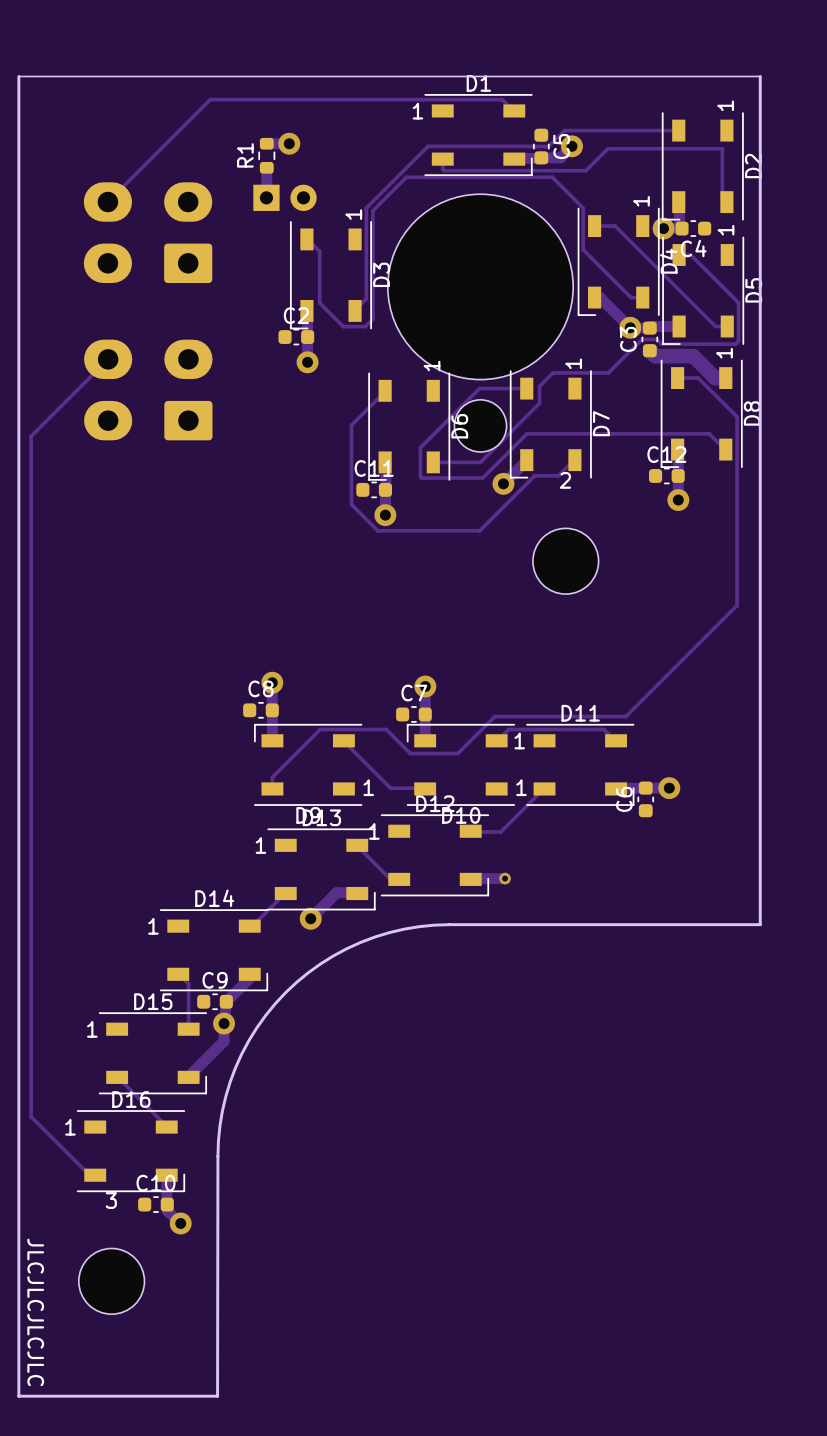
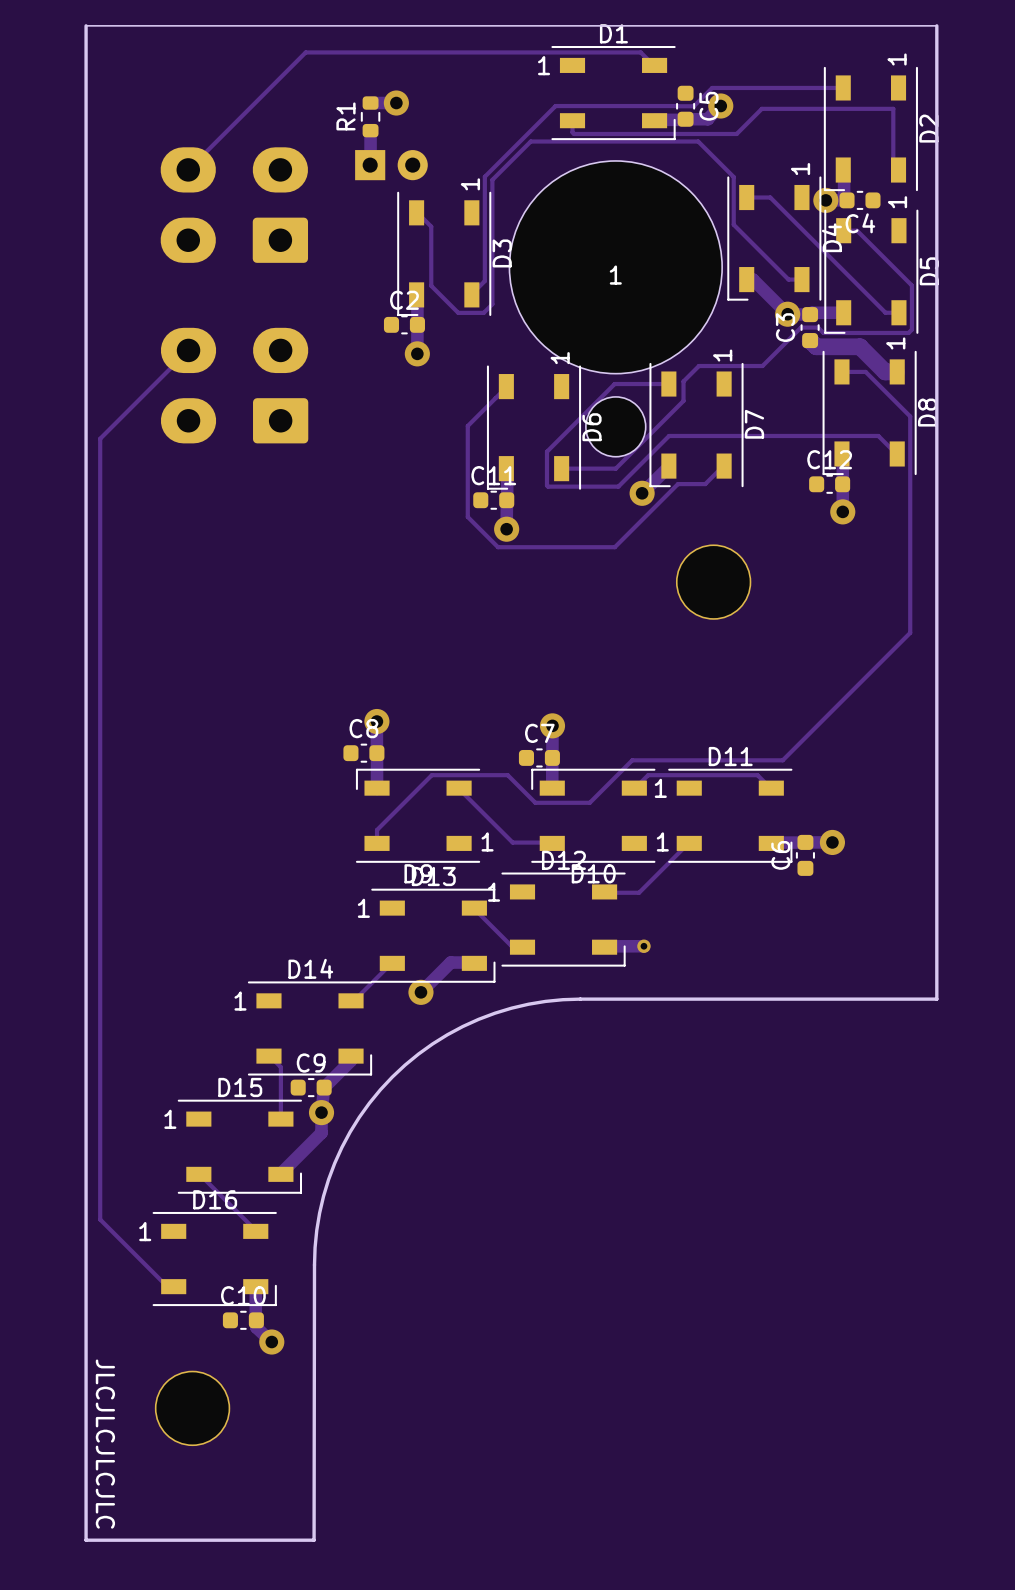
1 name: none -> 1 (615, 275)
2: (565, 561) -> none
part: none -> (713, 582)
3: (111, 1281) -> none
part: none -> (192, 1408)

